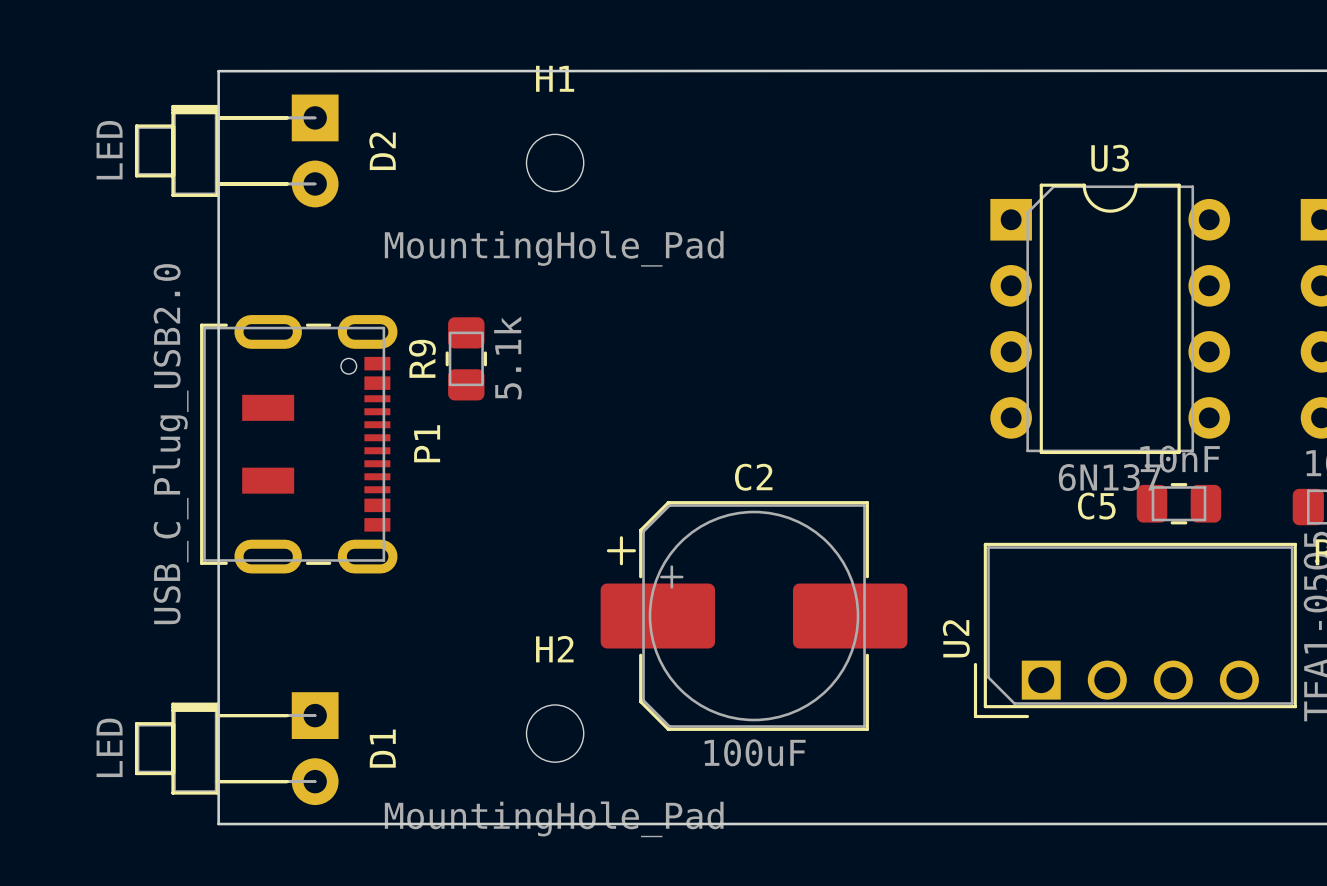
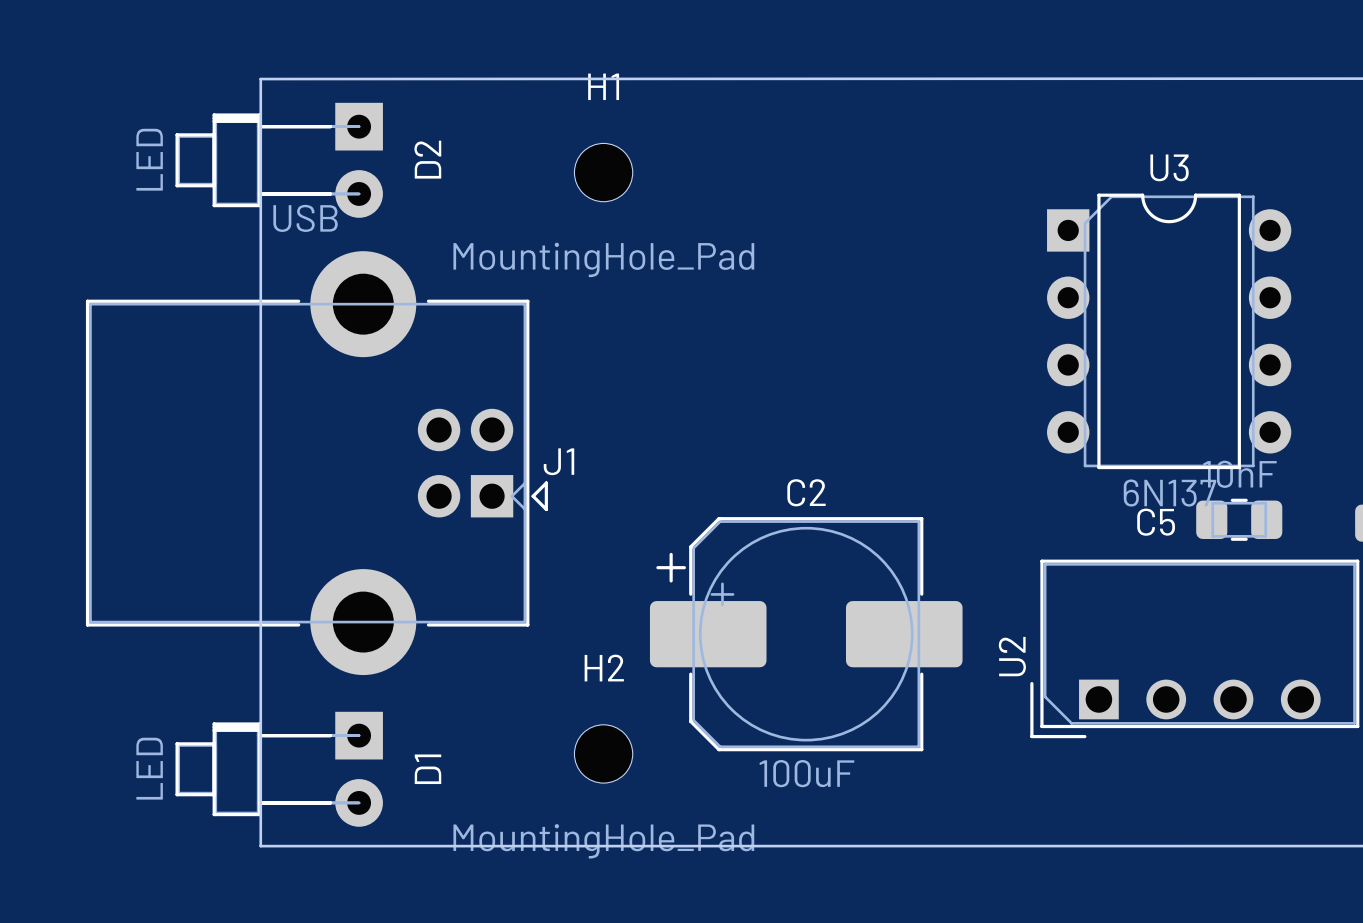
R9: 5.1k (466, 358) -> none
P1: USB_C_Plug_USB2.0 (298, 444) -> none
J1: none -> USB (316, 463)

